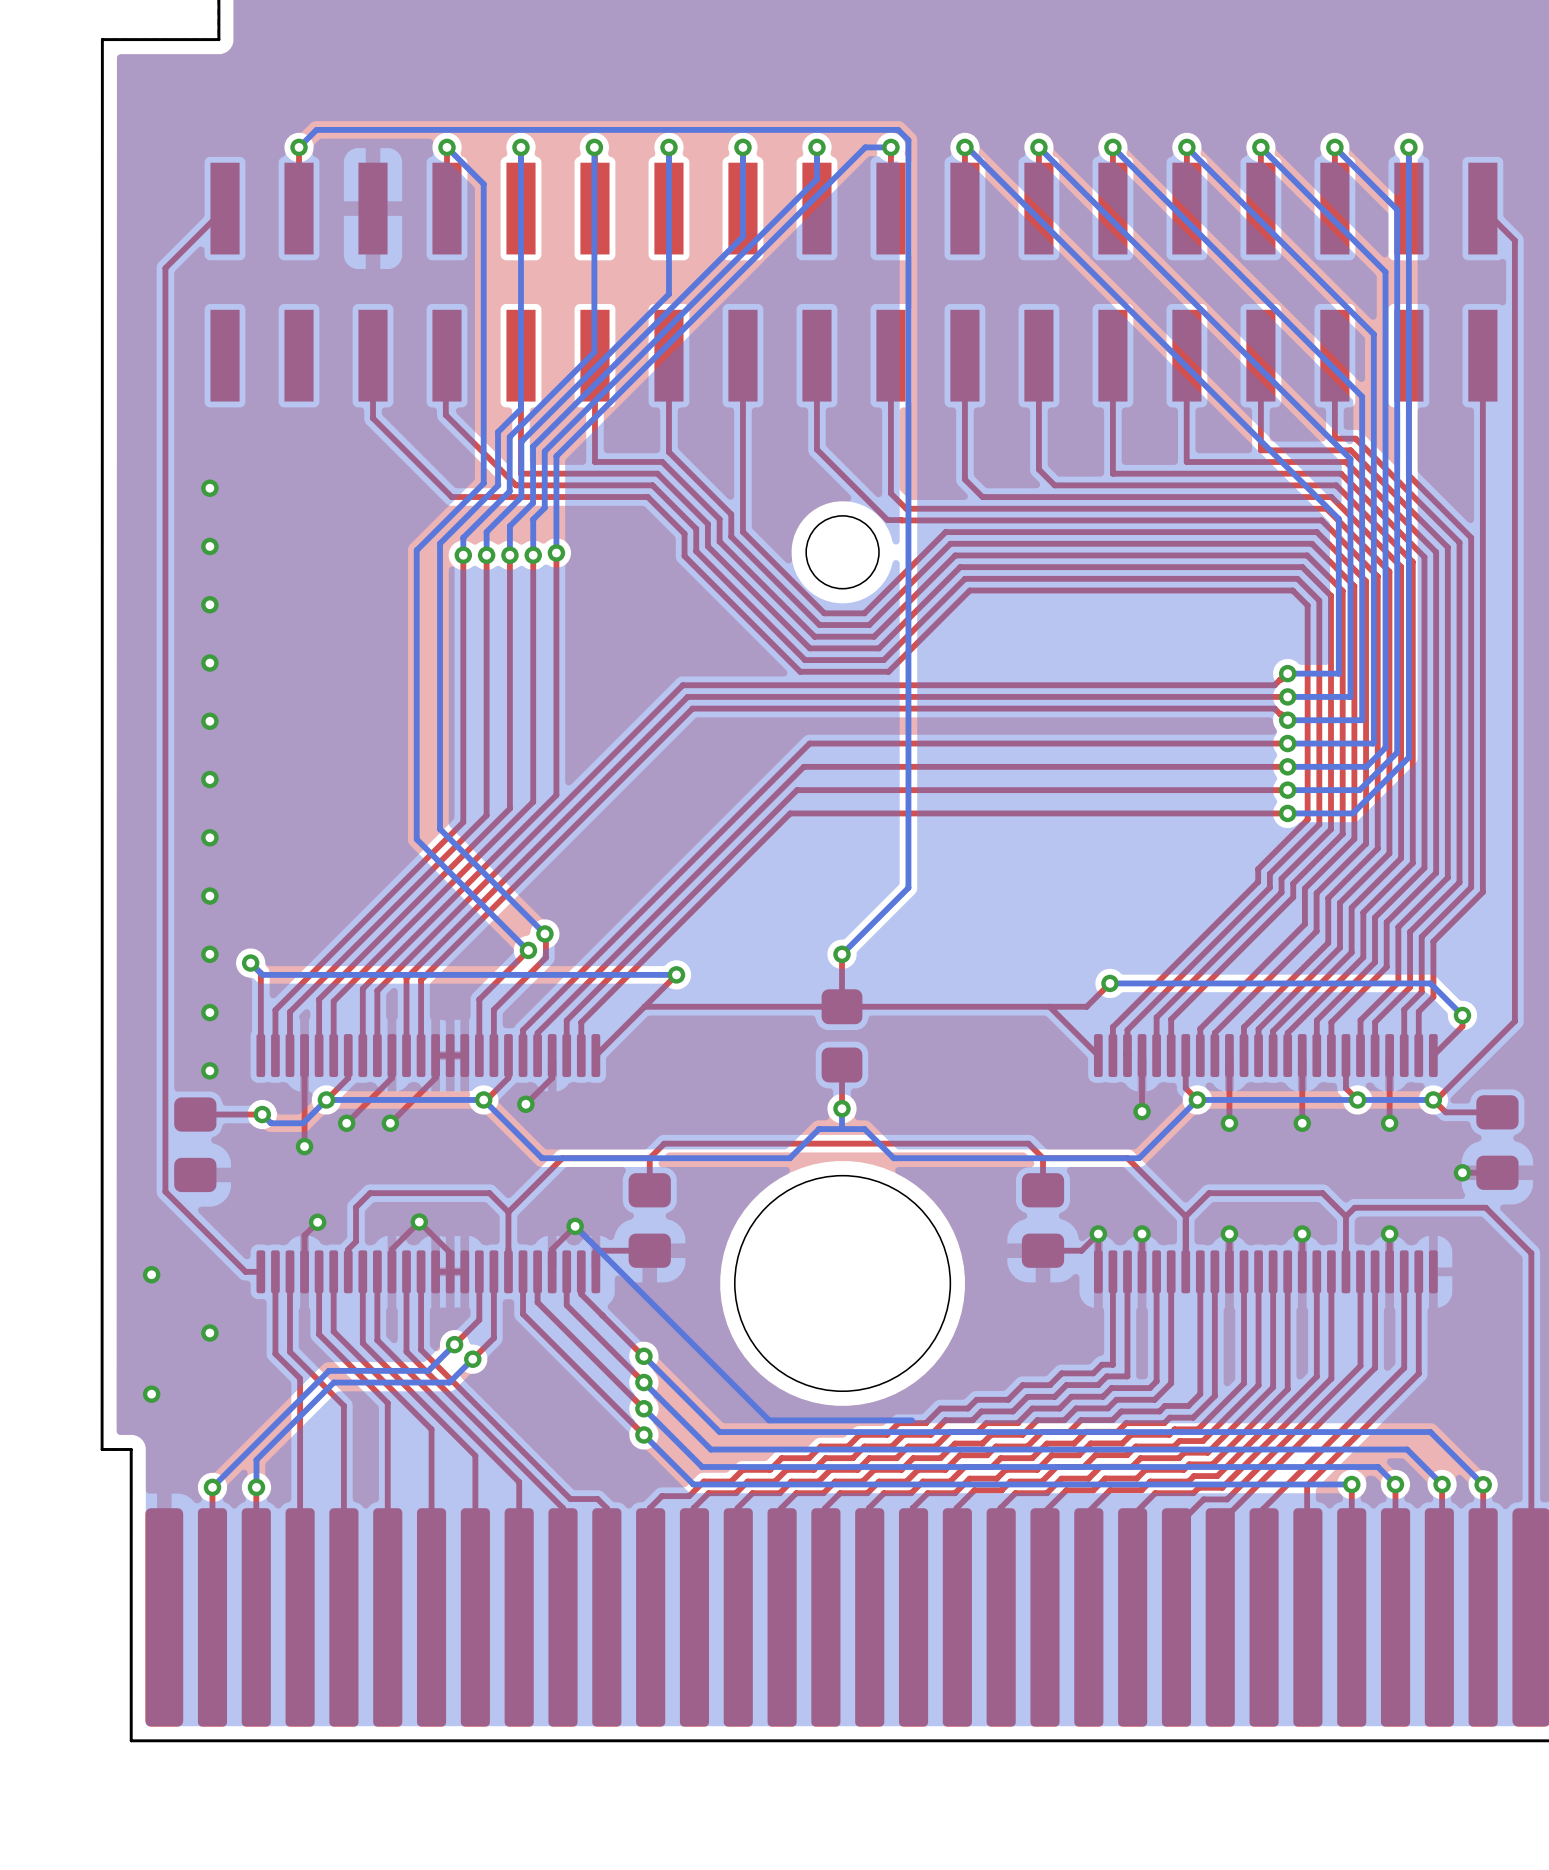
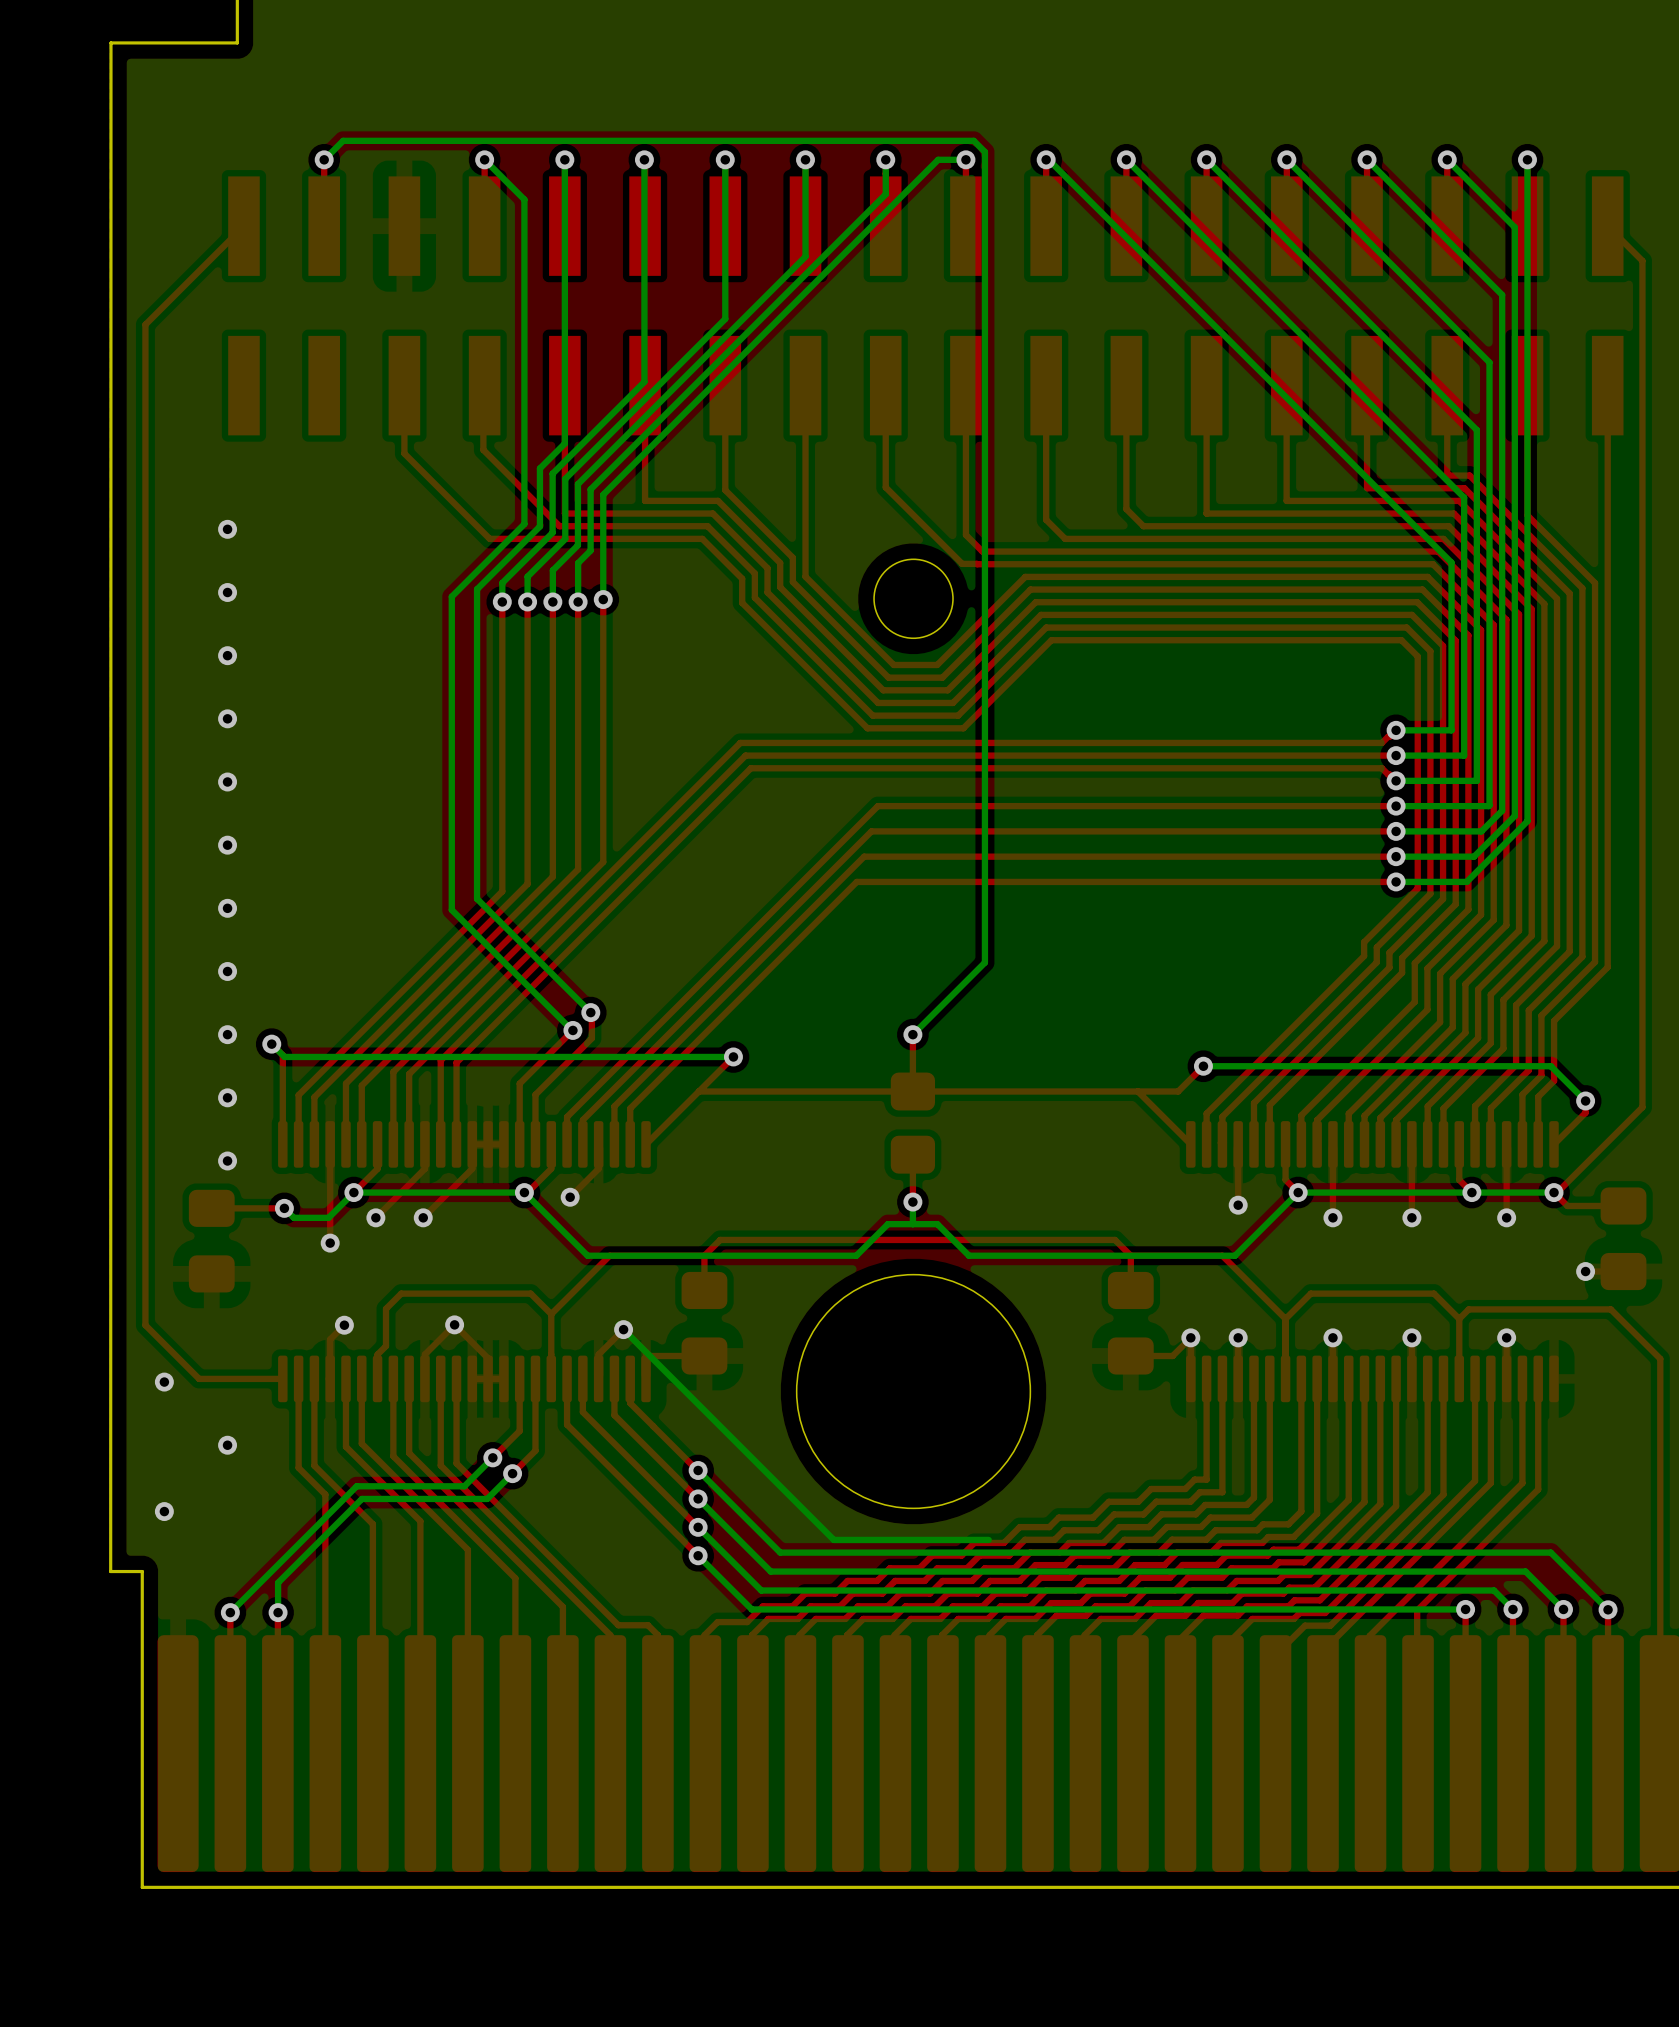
top track: (165, 268) (165, 1191) (245, 1271) -> (179, 290) (145, 324) (145, 1325) (199, 1378) (266, 1378)

